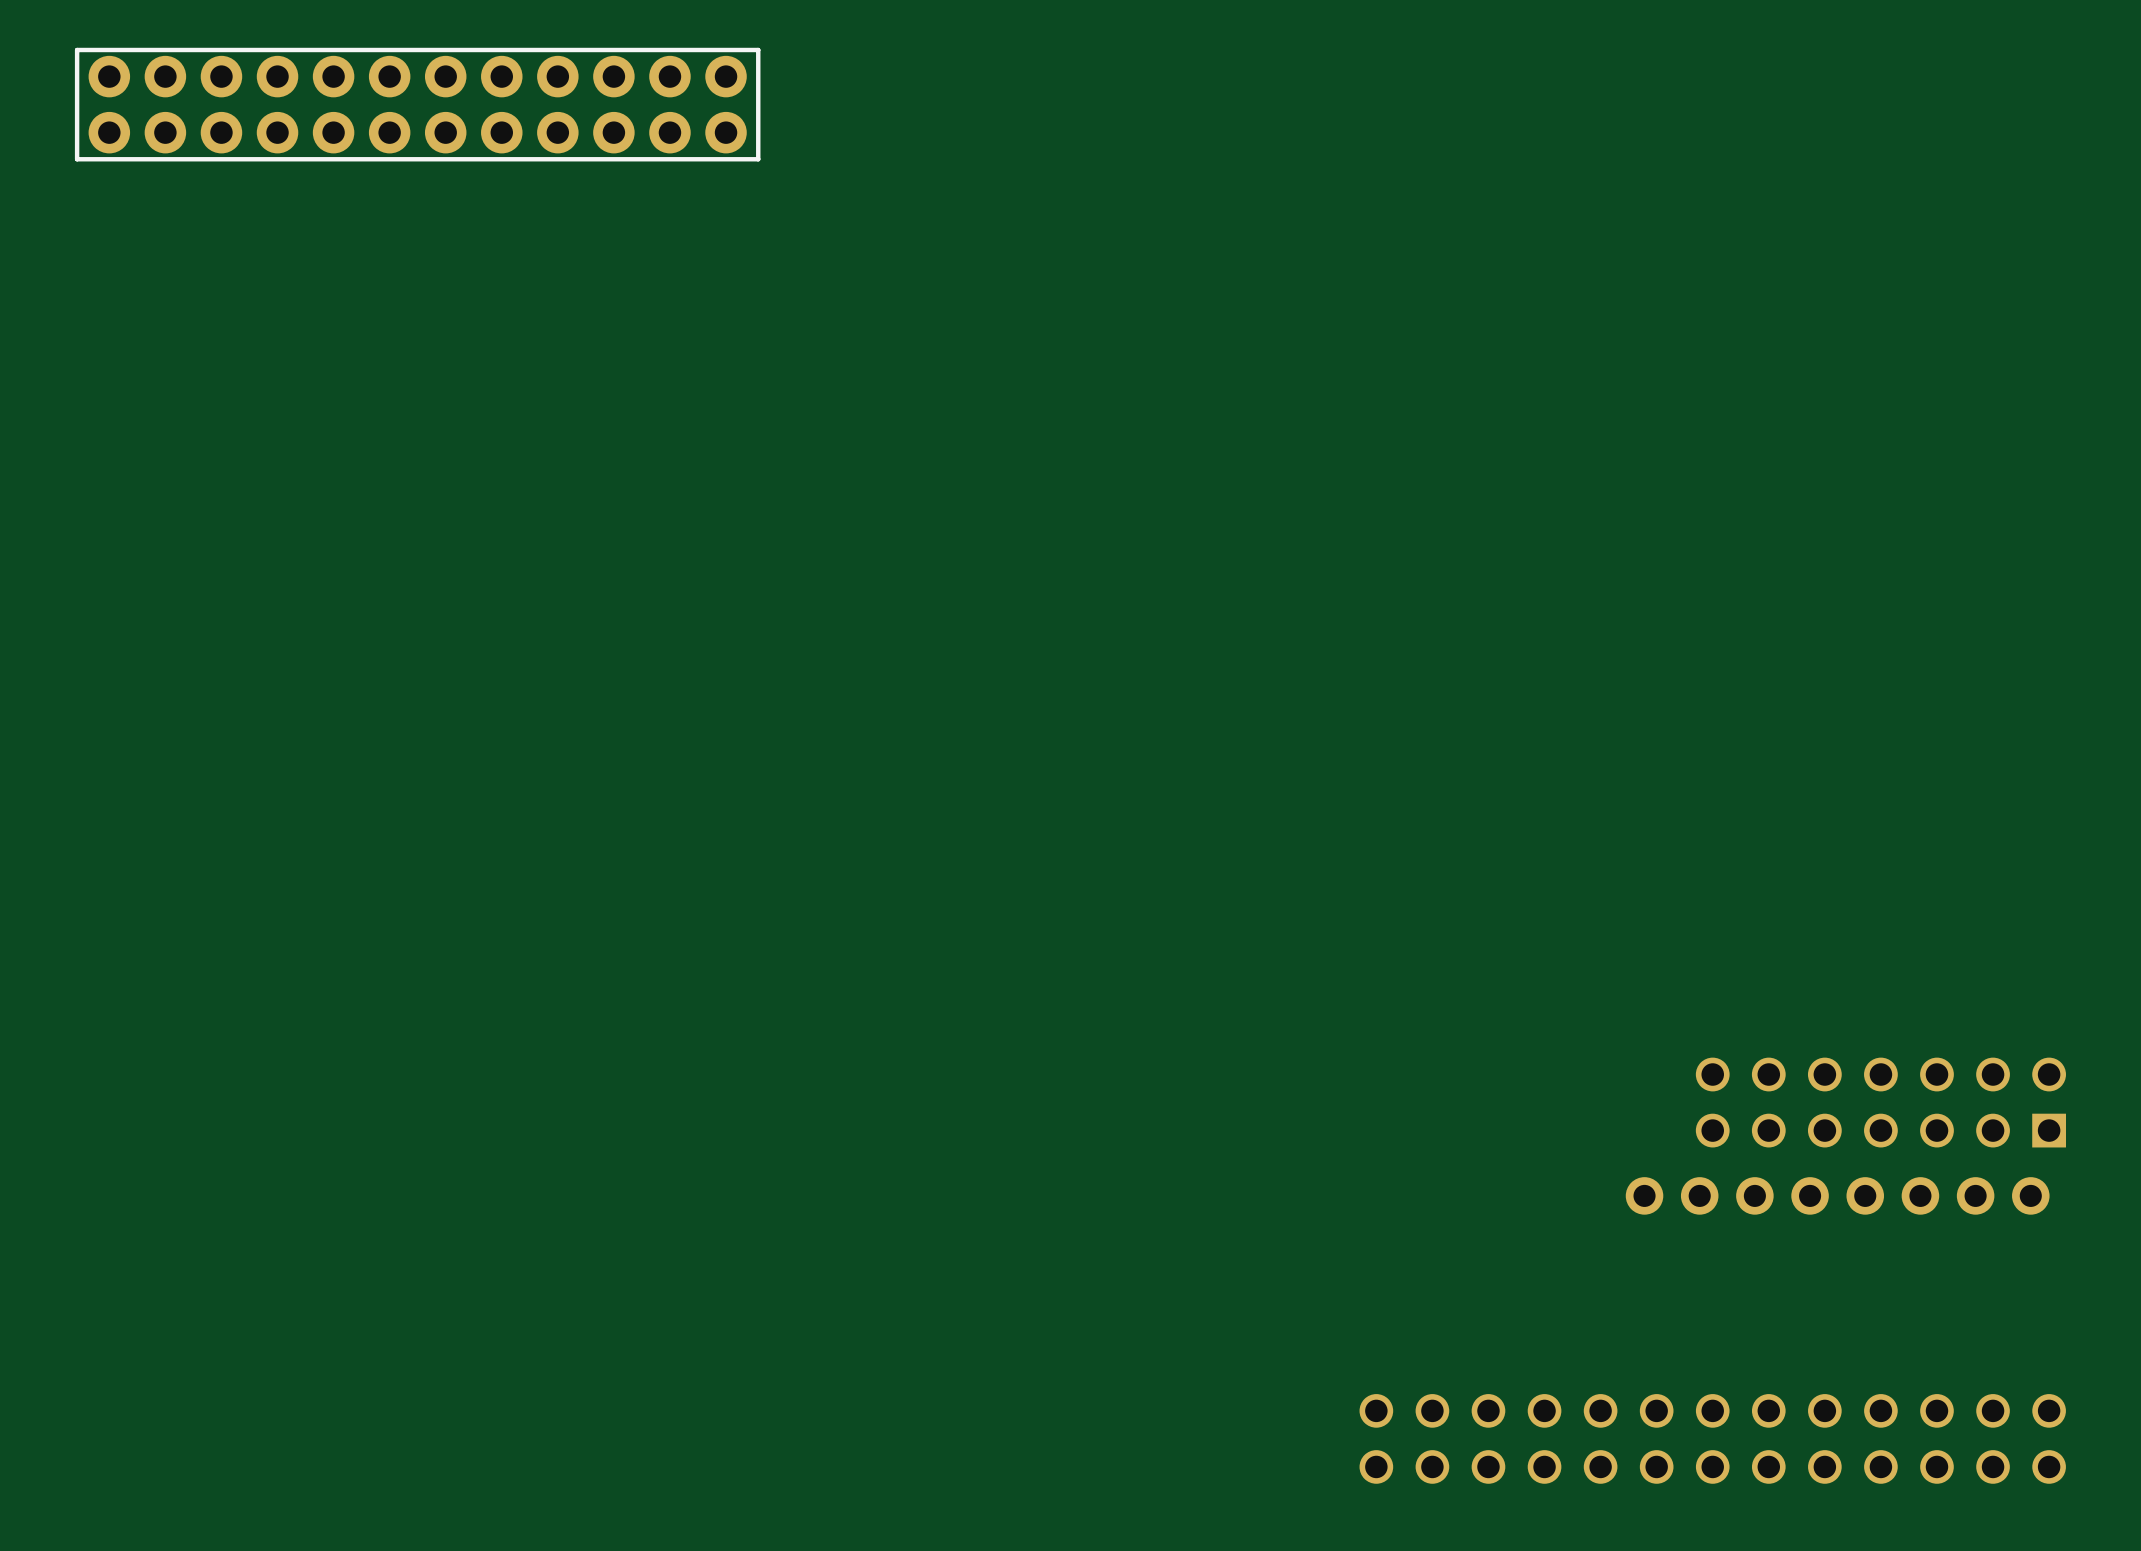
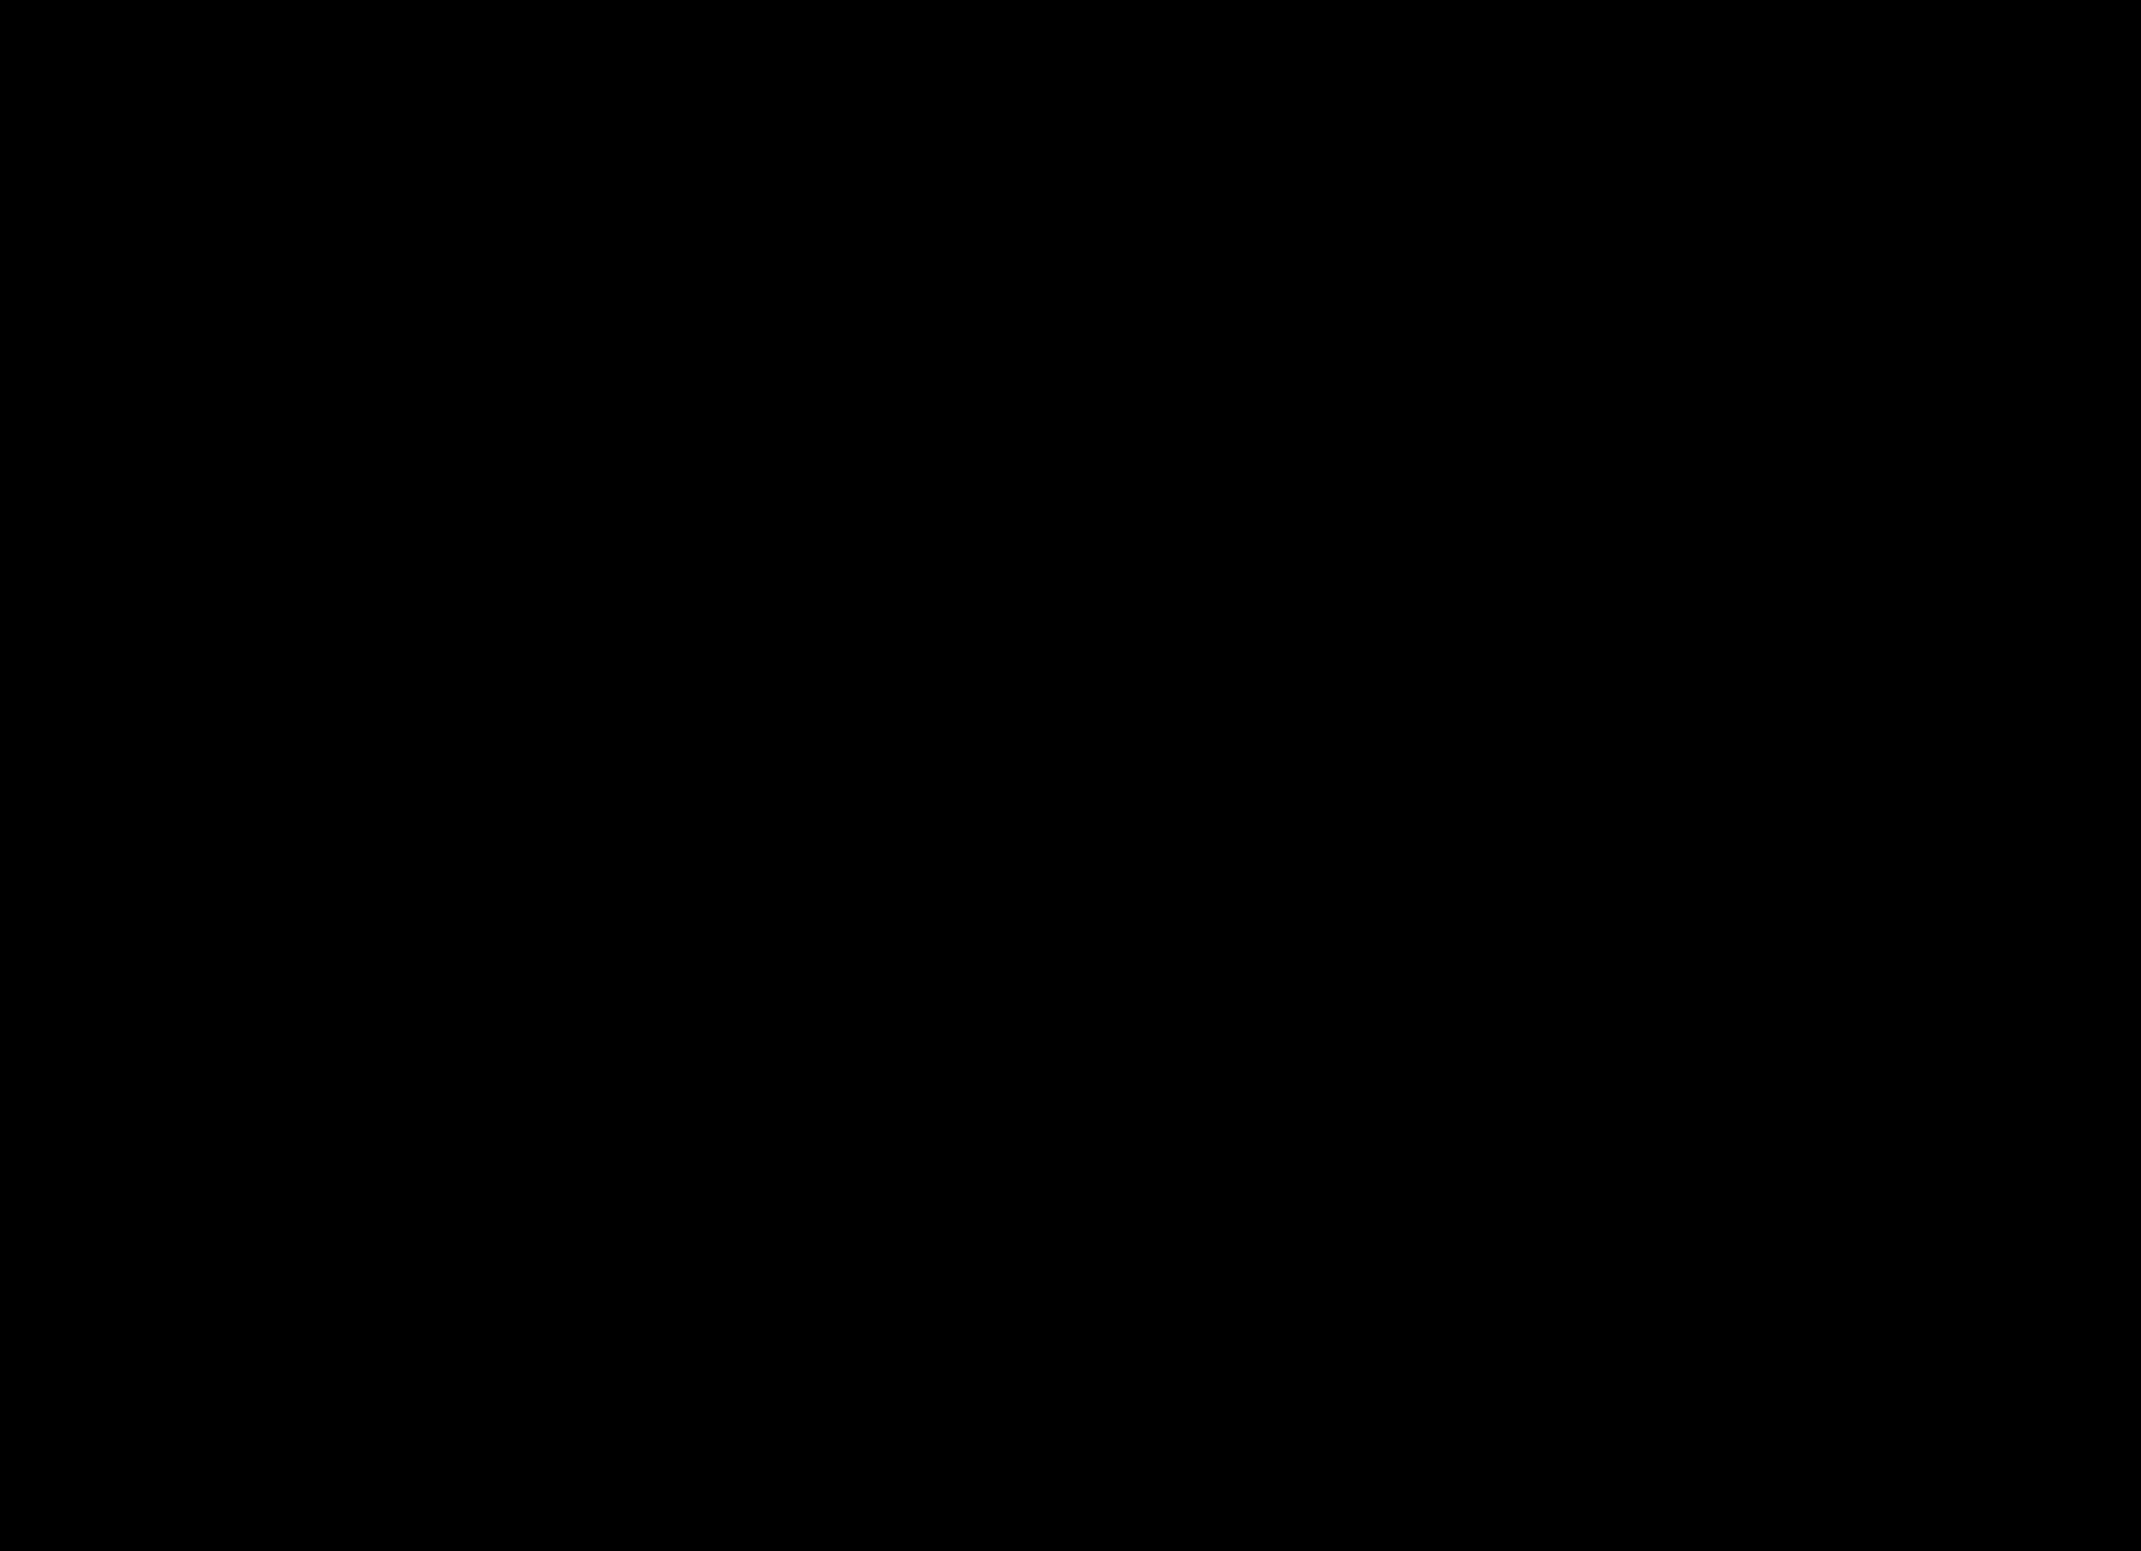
part: (417, 104) -> none
part: (1880, 1102) -> none
part: (1837, 1195) -> none
part: (1712, 1438) -> none

